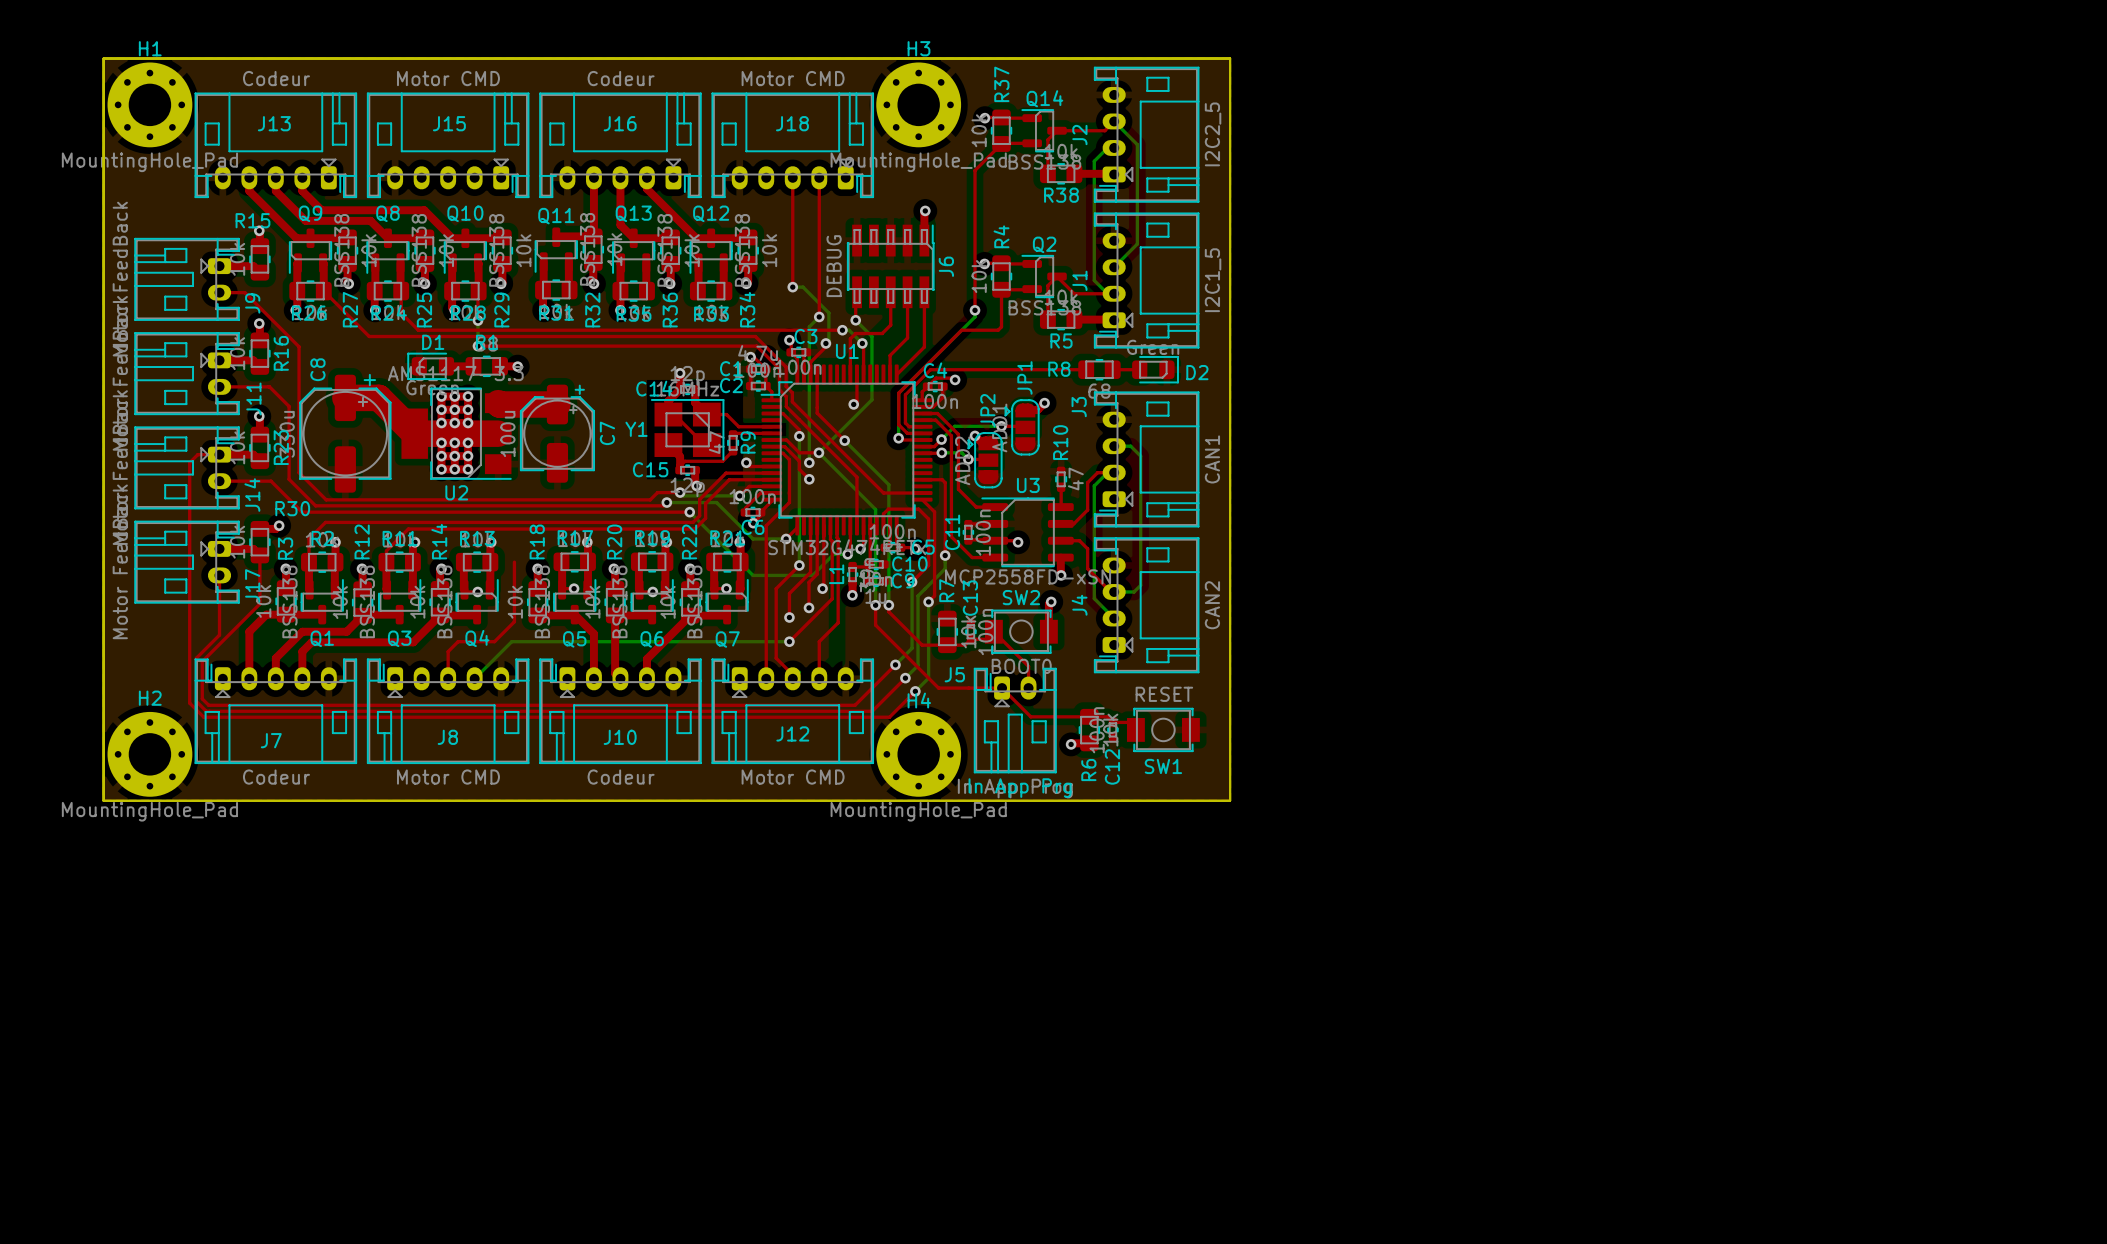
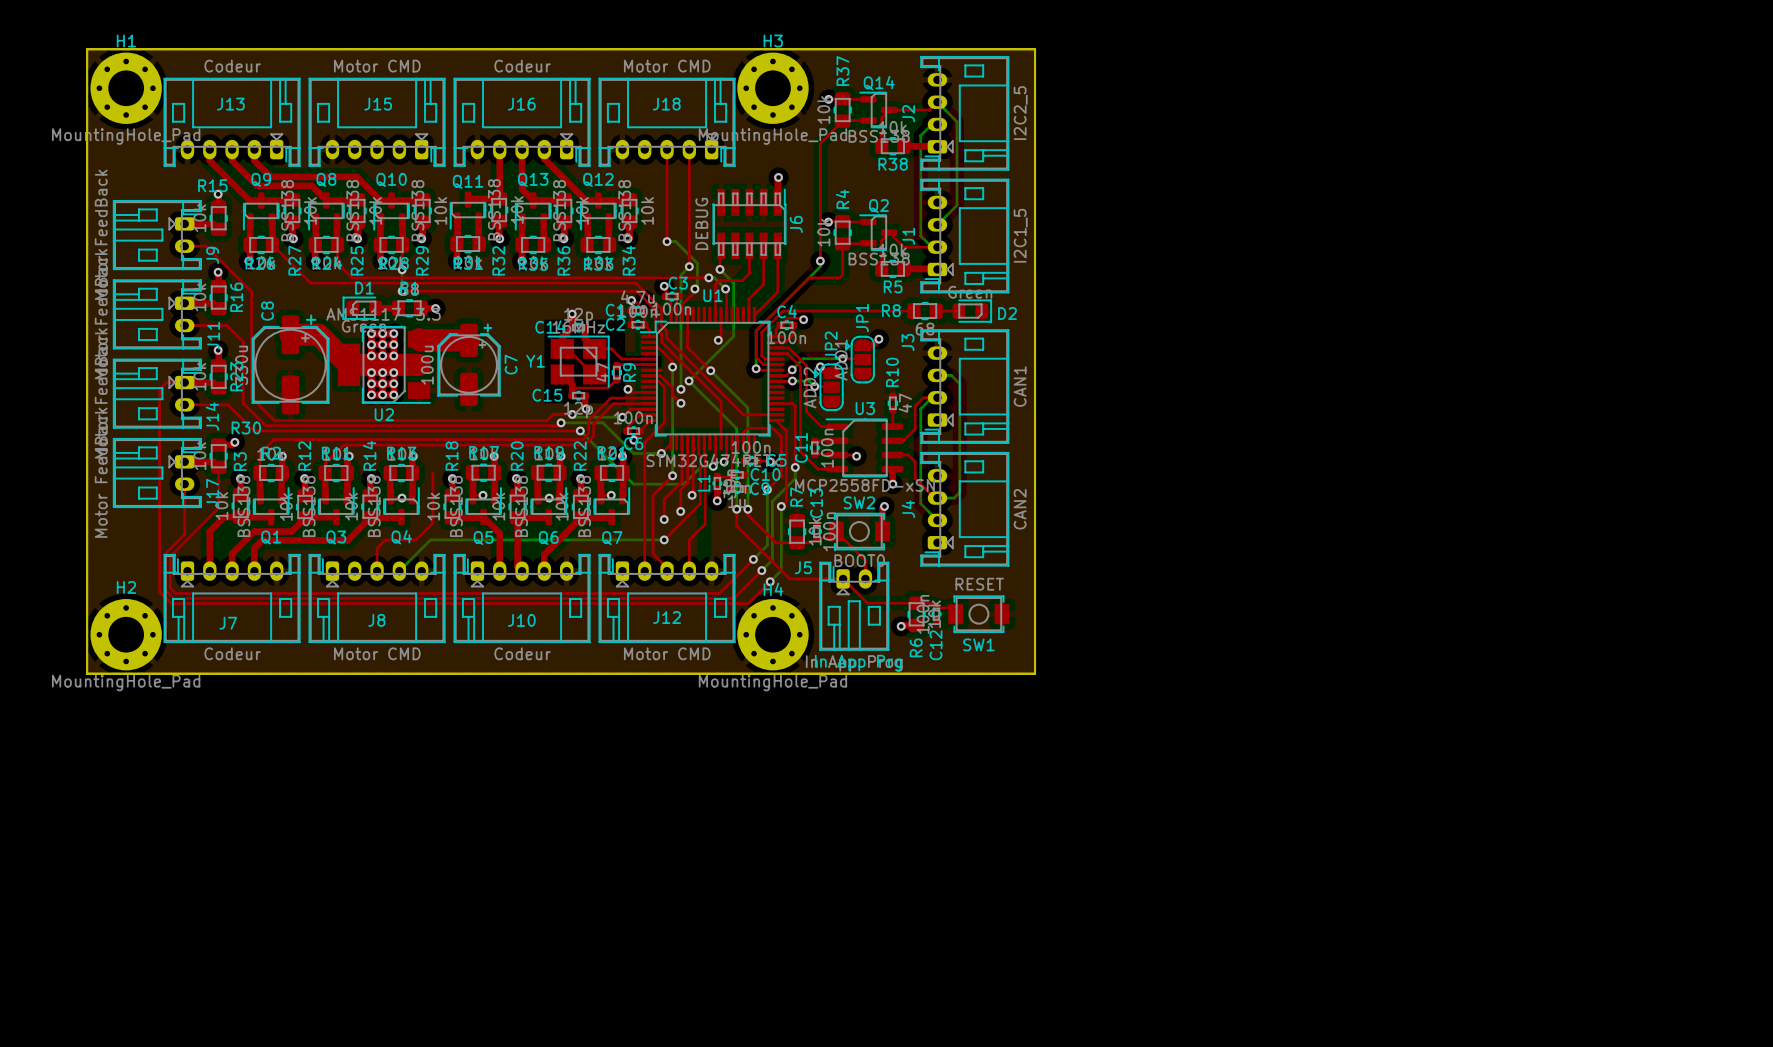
top track: (786, 440) (799, 452) (818, 452) -> none

